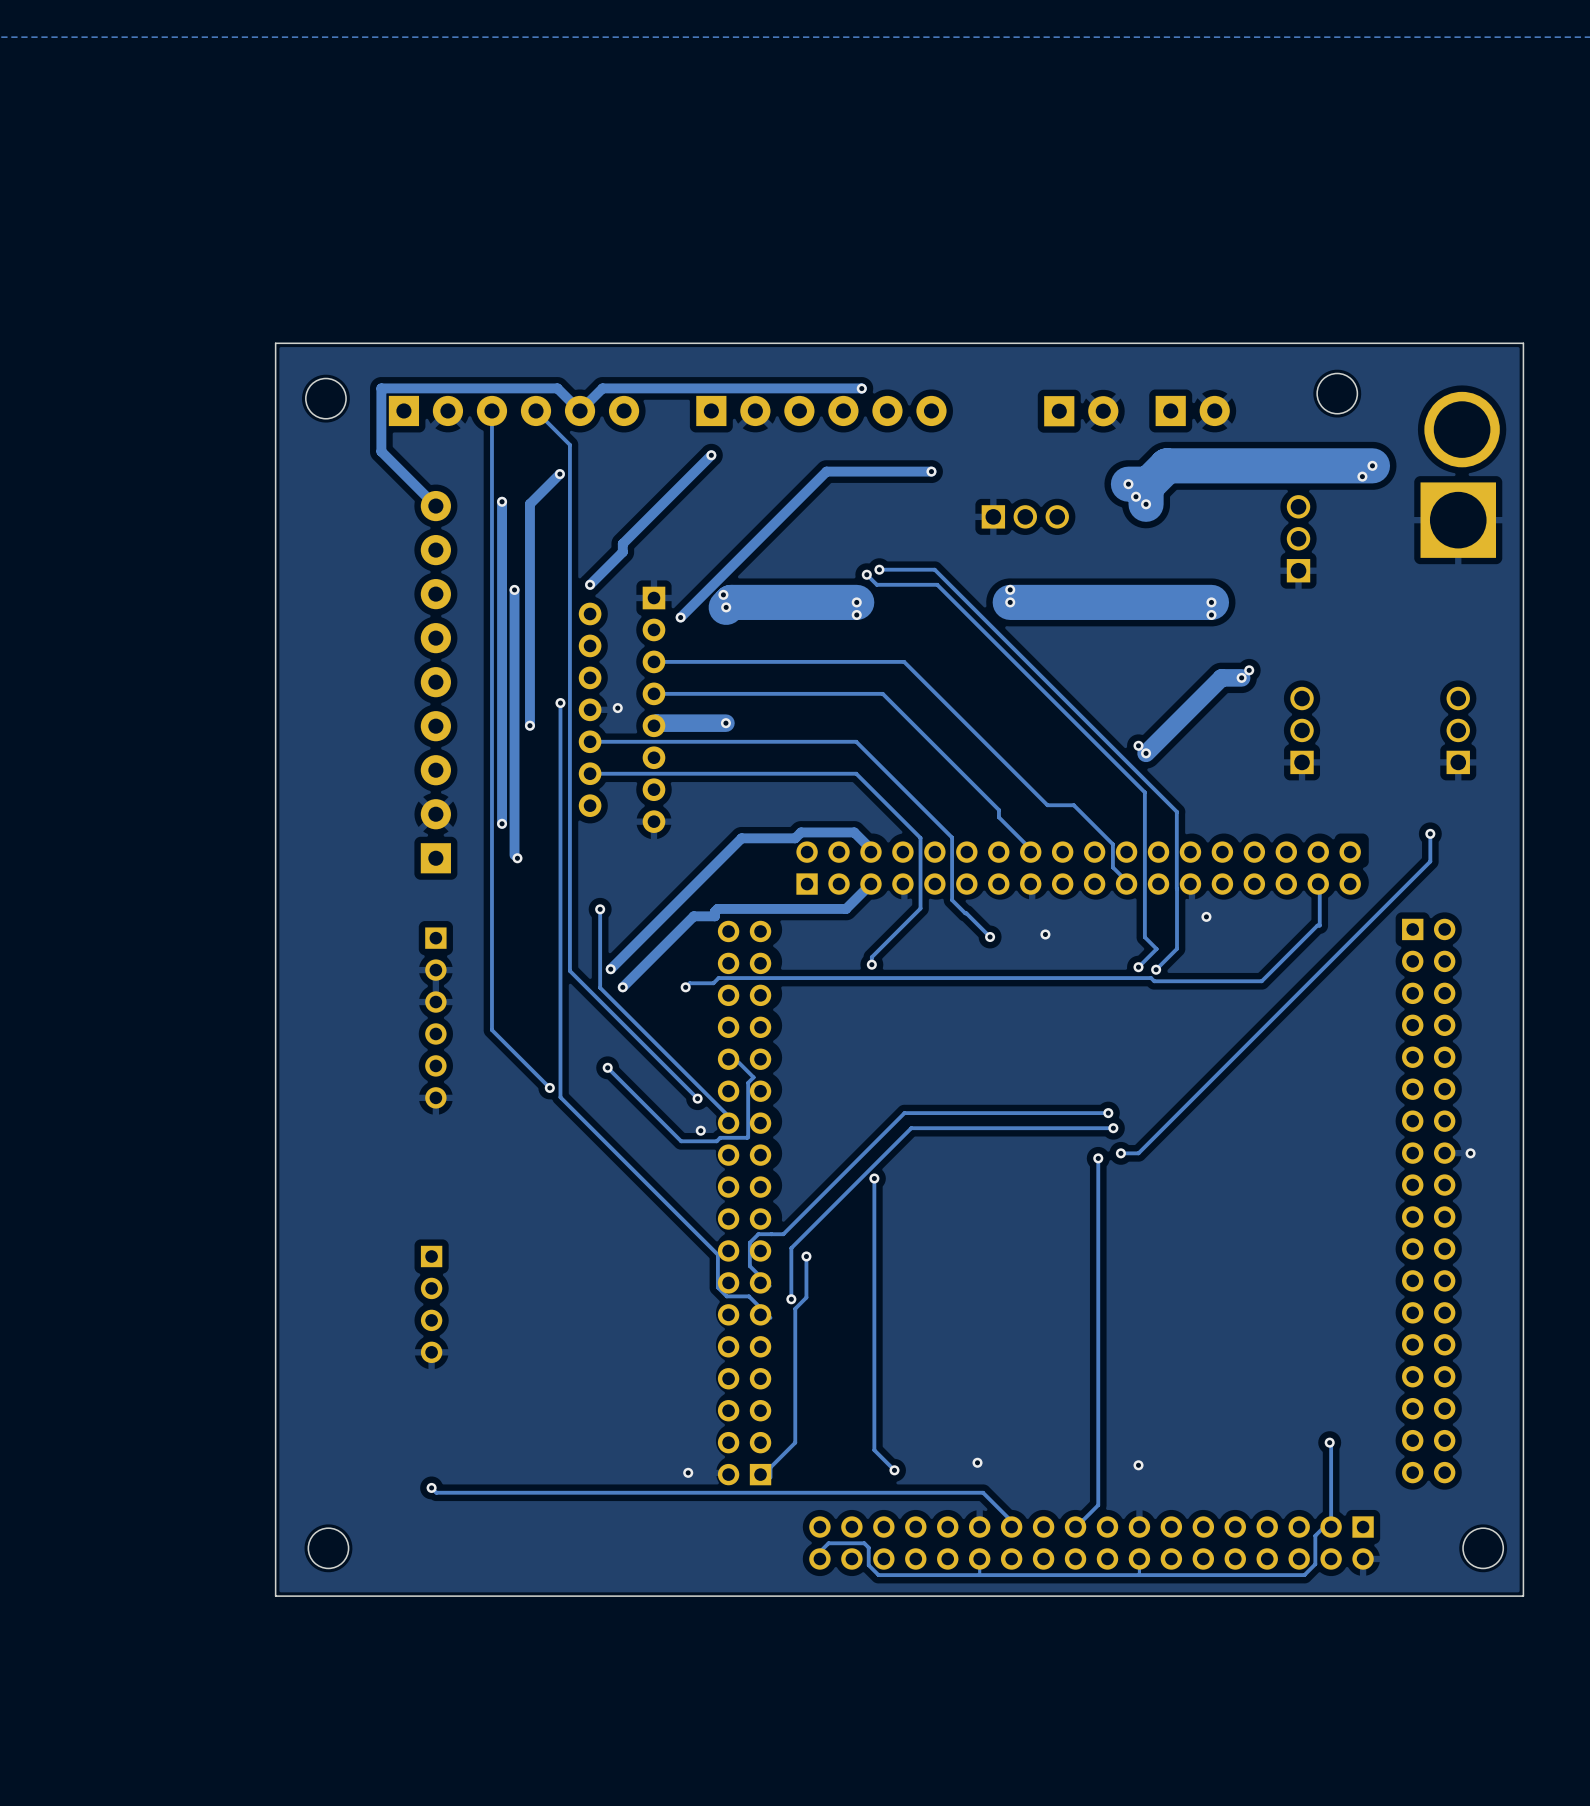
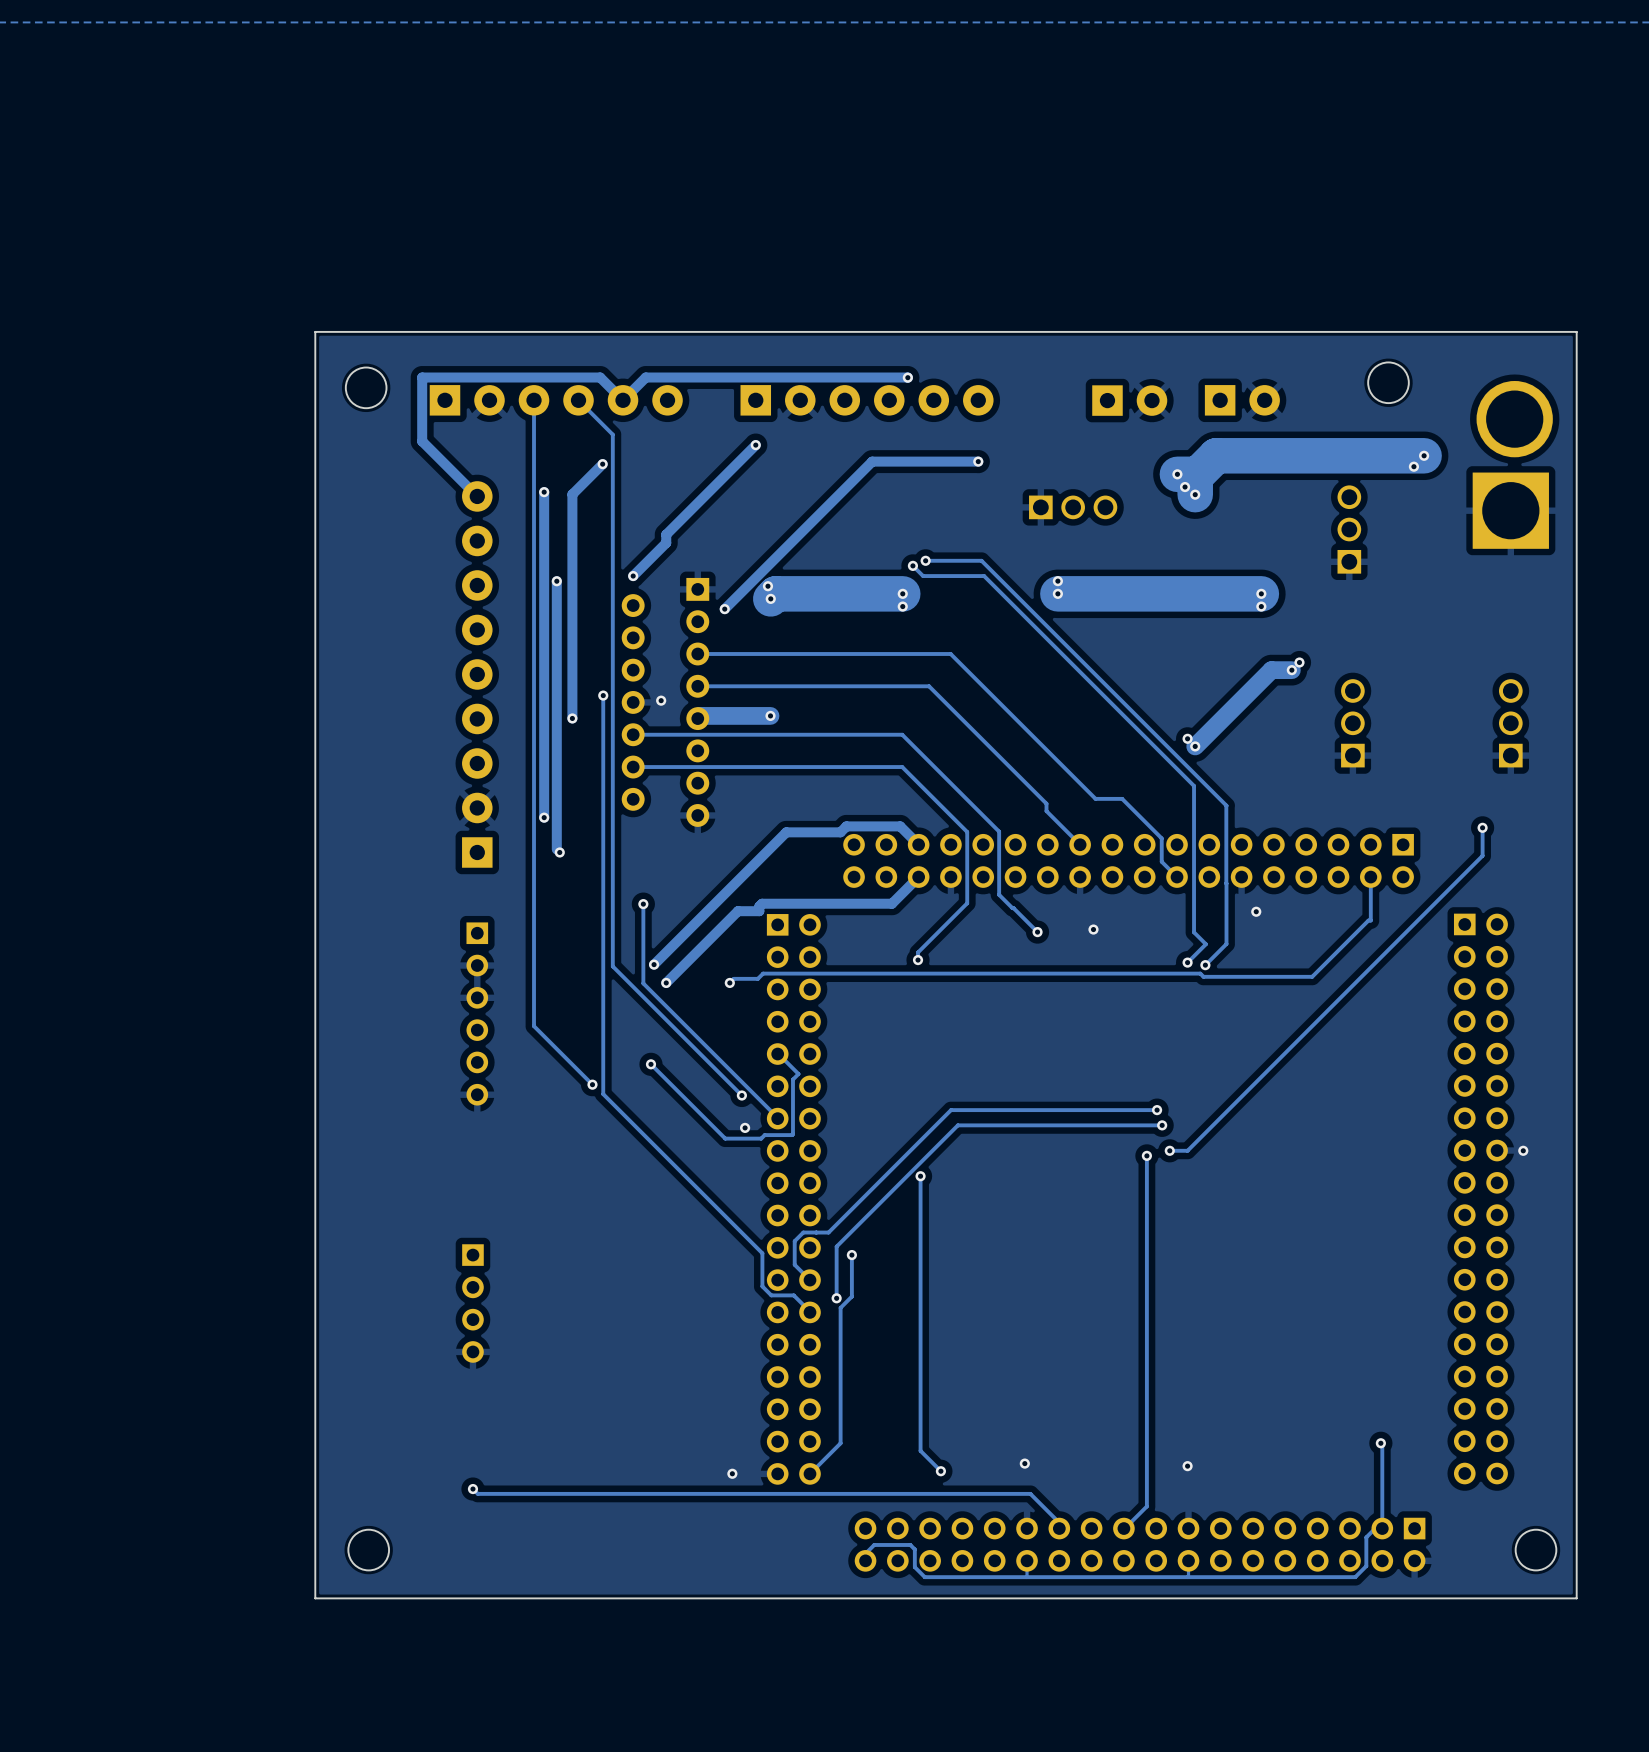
part rotation: 0° (1078, 868) -> 180° (1128, 860)
part rotation: 0° (744, 1203) -> 180° (793, 1199)

